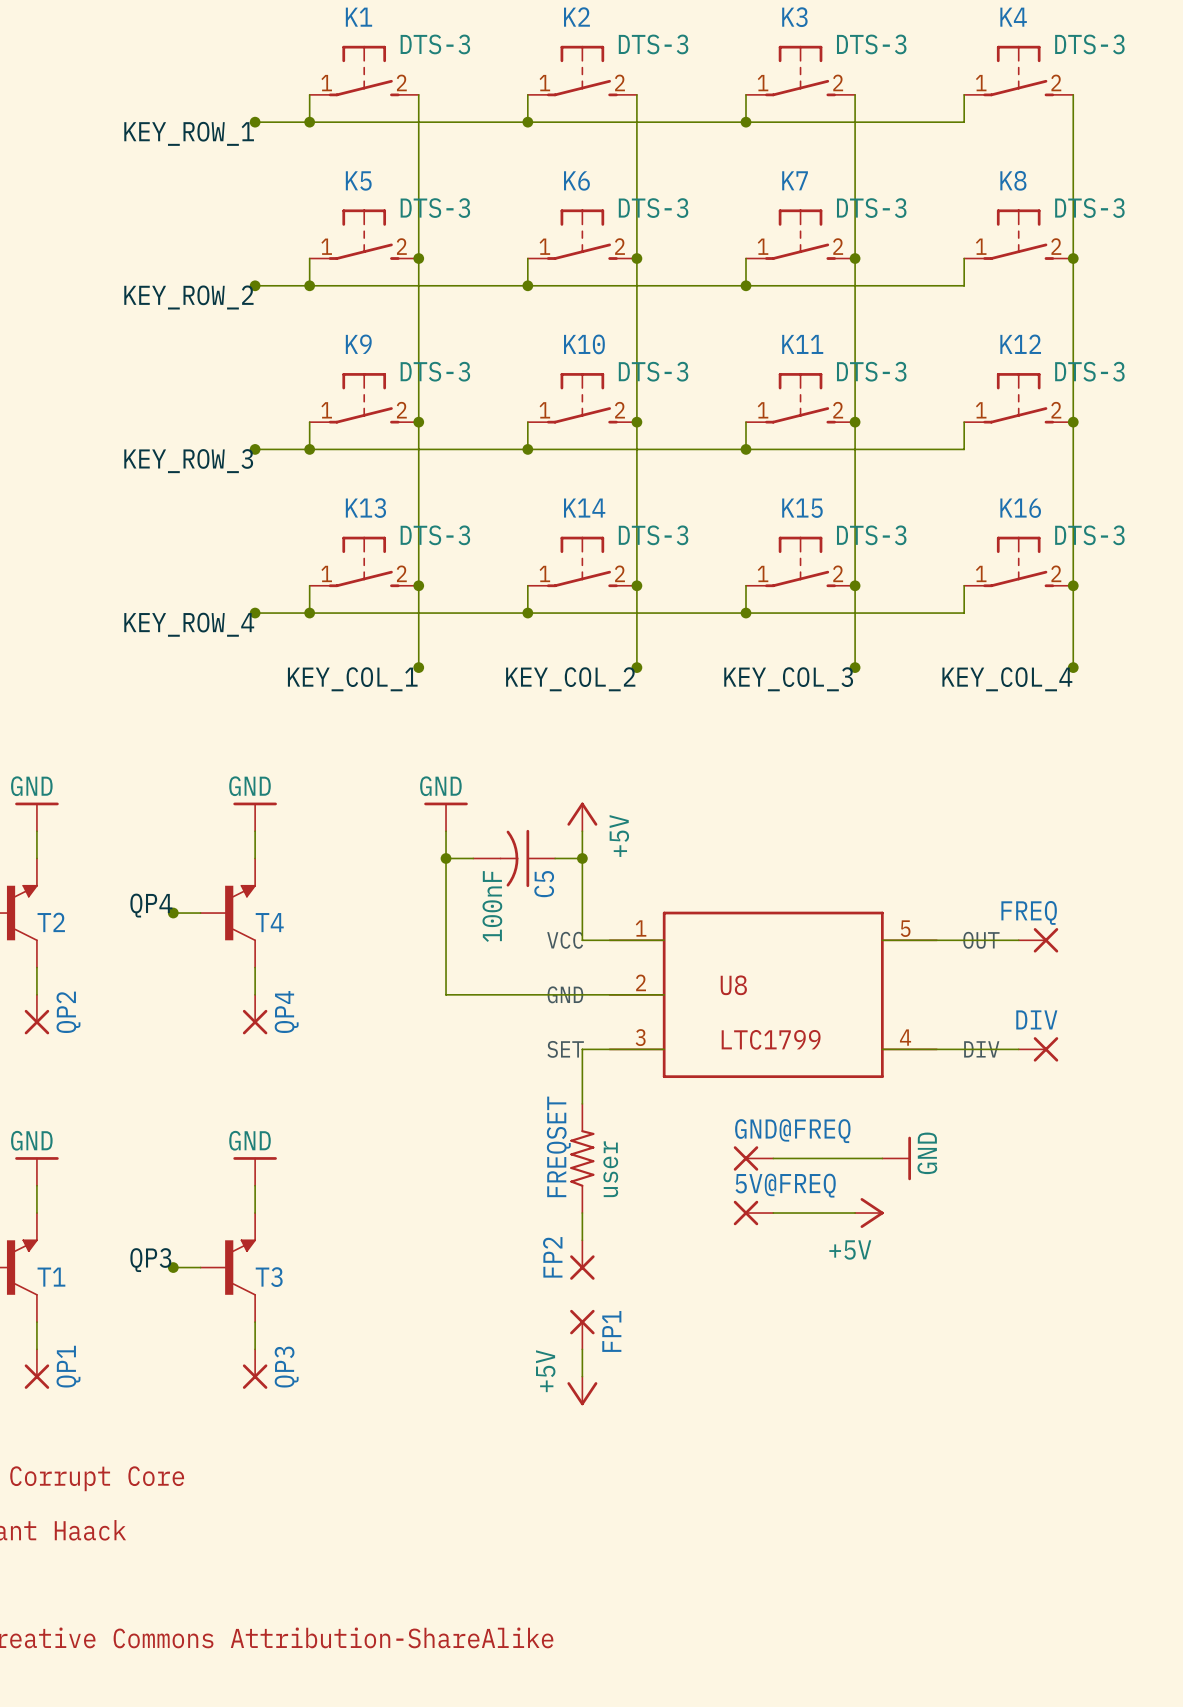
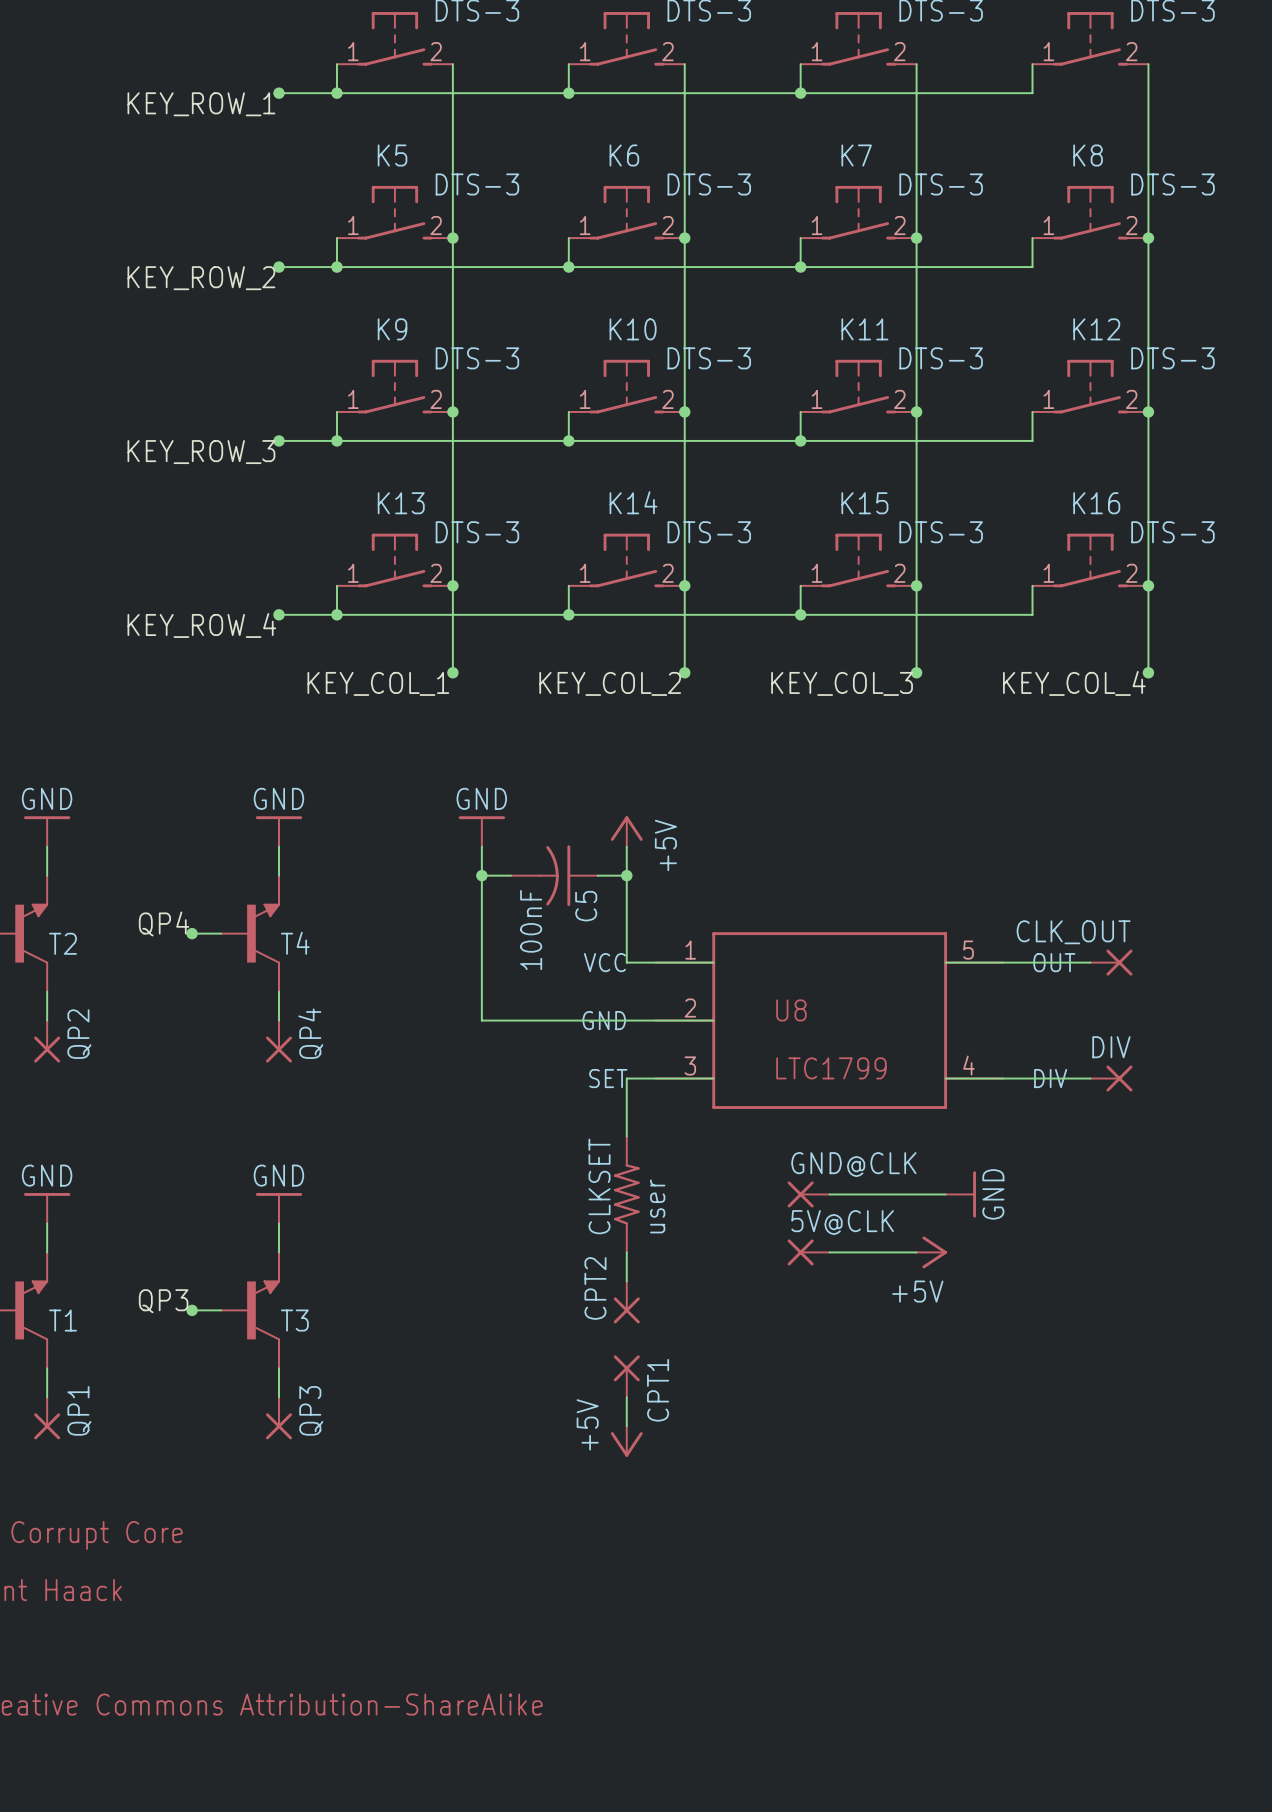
FREQ name: FREQ (1029, 912) -> CLK_OUT (1073, 932)
GND@FREQ name: GND@FREQ (792, 1131) -> GND@CLK (853, 1164)
FREQSET name: FREQSET (558, 1146) -> CLKSET (599, 1186)
5V@FREQ name: 5V@FREQ (785, 1185) -> 5V@CLK (842, 1222)
FP2 name: FP2 (552, 1257) -> CPT2 (595, 1288)
FP1 name: FP1 (611, 1331) -> CPT1 (658, 1390)

